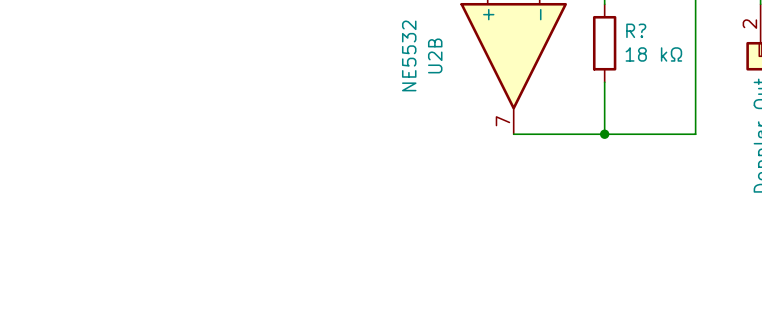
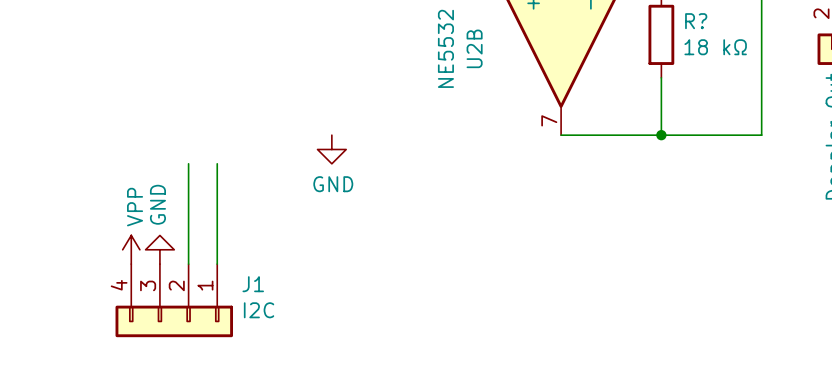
power symbol: none -> GND (331, 149)
wire: none -> (188, 163) (188, 264)
wire: none -> (217, 163) (217, 264)
power symbol: none -> VPP (131, 249)
power symbol: none -> GND (159, 249)
J1: none -> I2C (174, 300)

